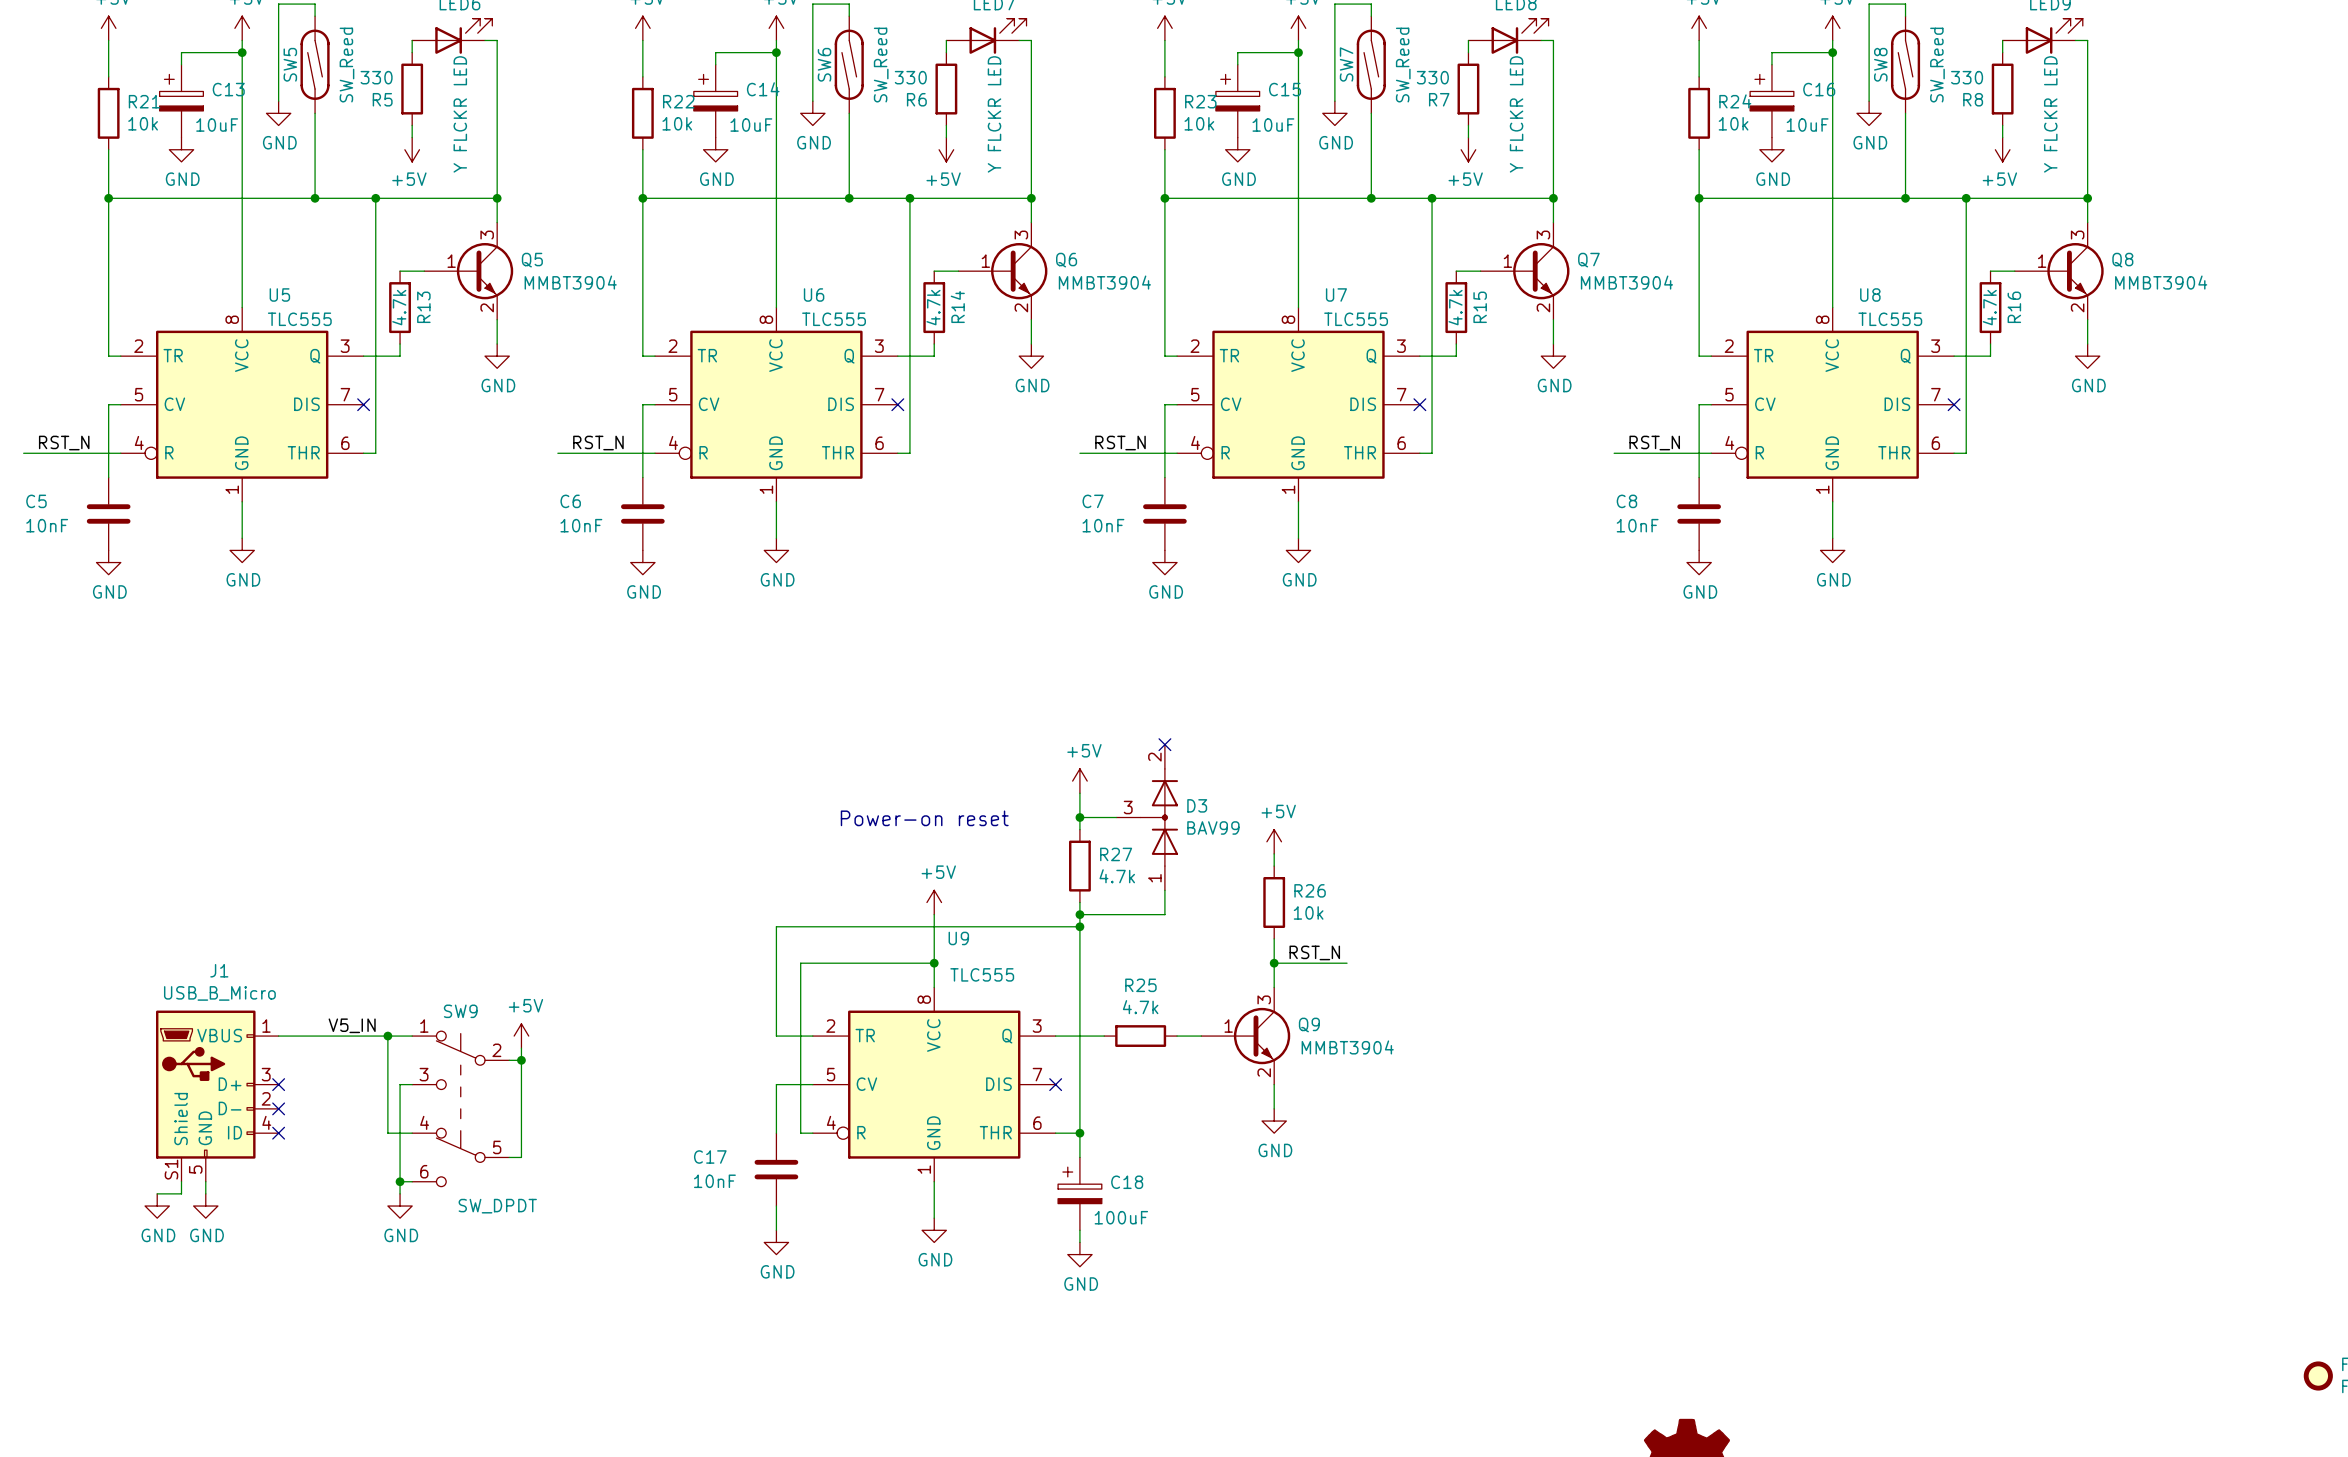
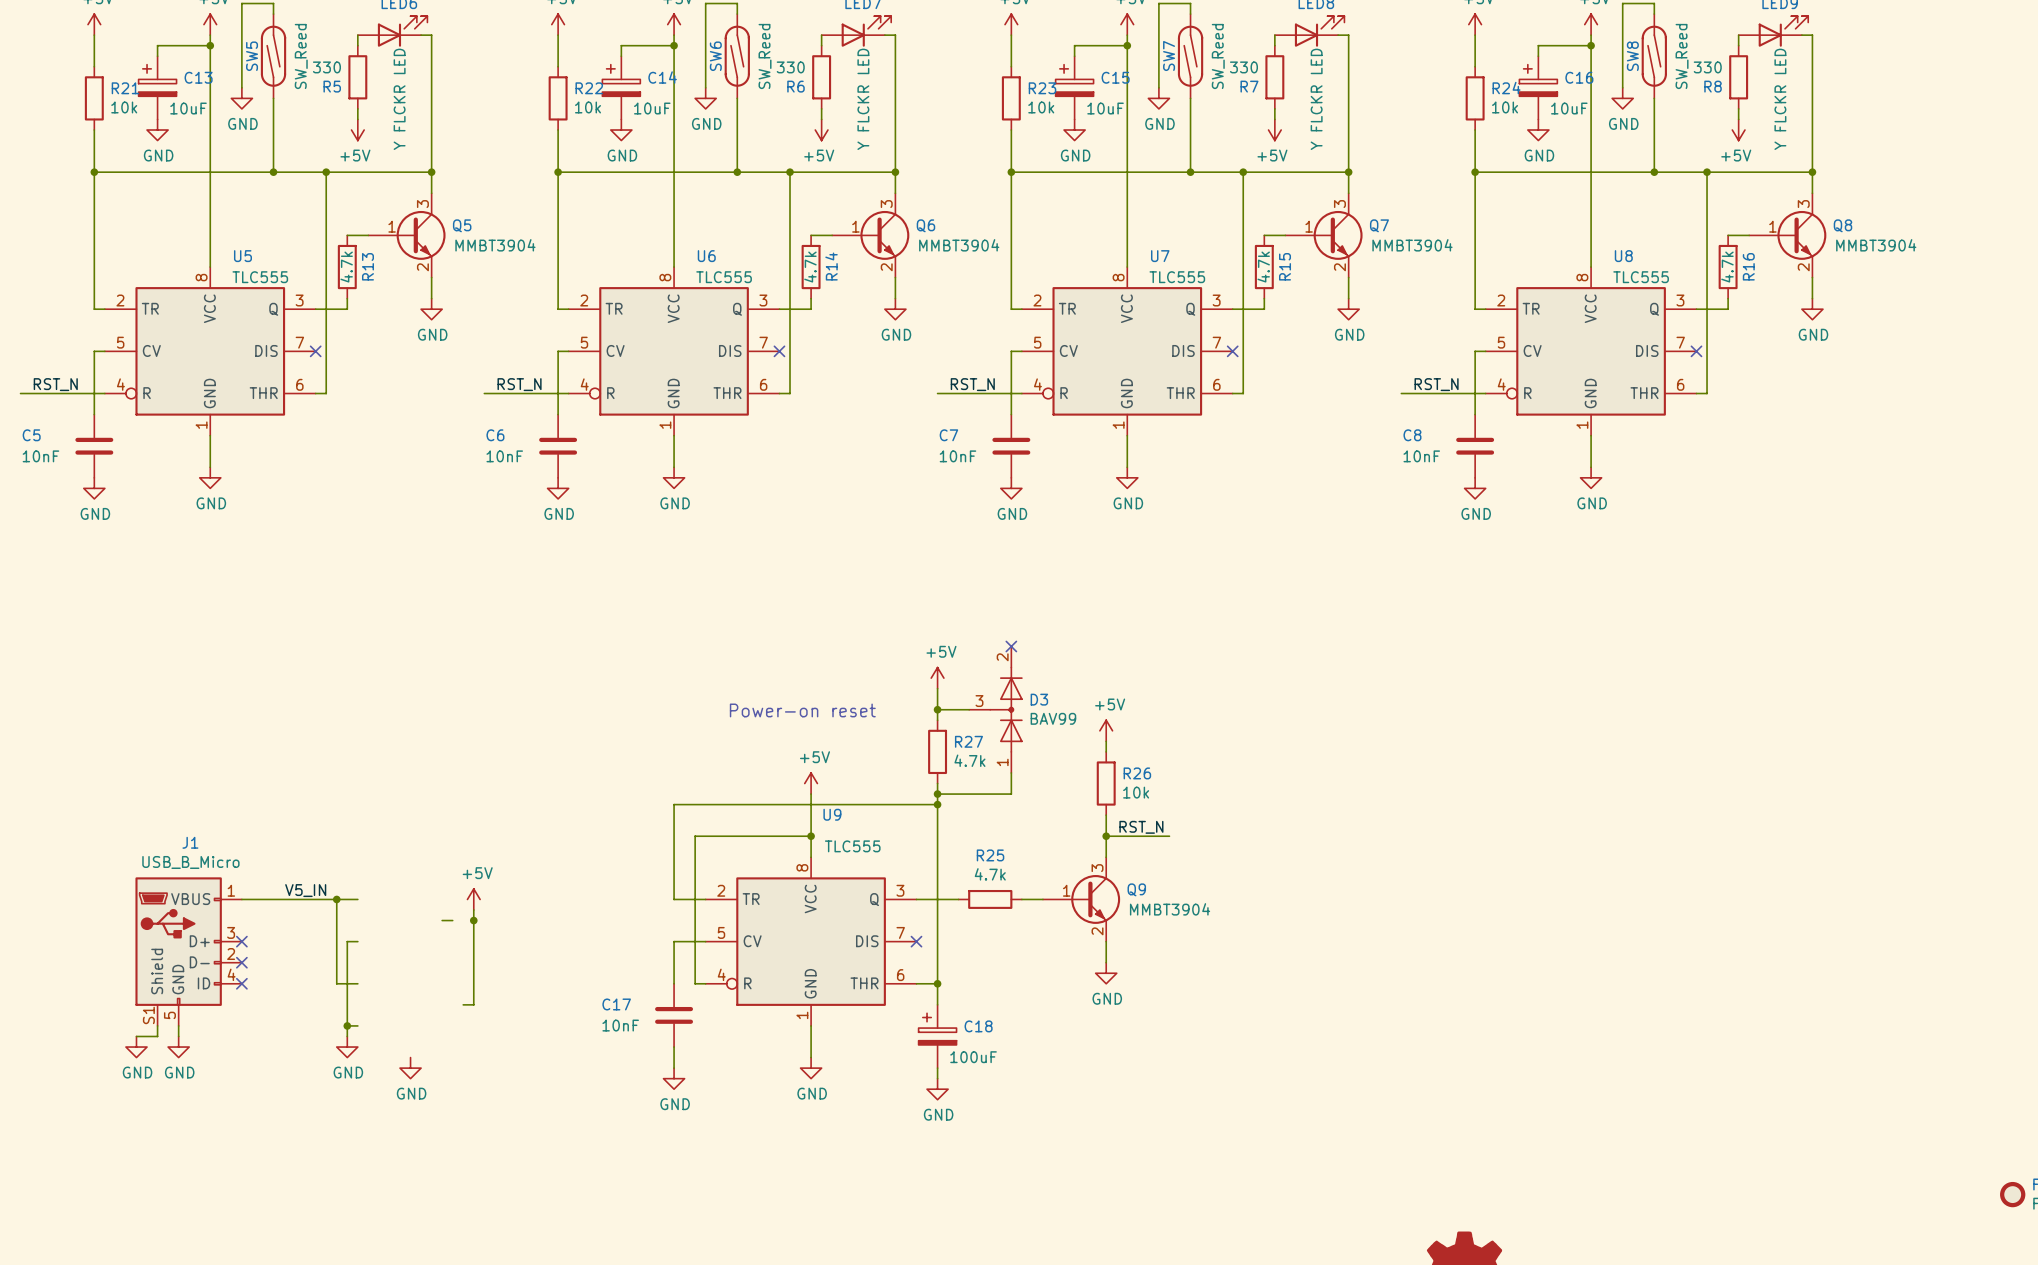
power symbol position: +5V (521, 1036) -> +5V (473, 899)
wire: (521, 1048) (521, 1157) (509, 1157) -> (473, 910) (473, 1004) (463, 1004)
junction position: (521, 1060) -> (473, 920)
SW9: SW_DPDT (460, 1108) -> none
power symbol: none -> GND (410, 1068)

